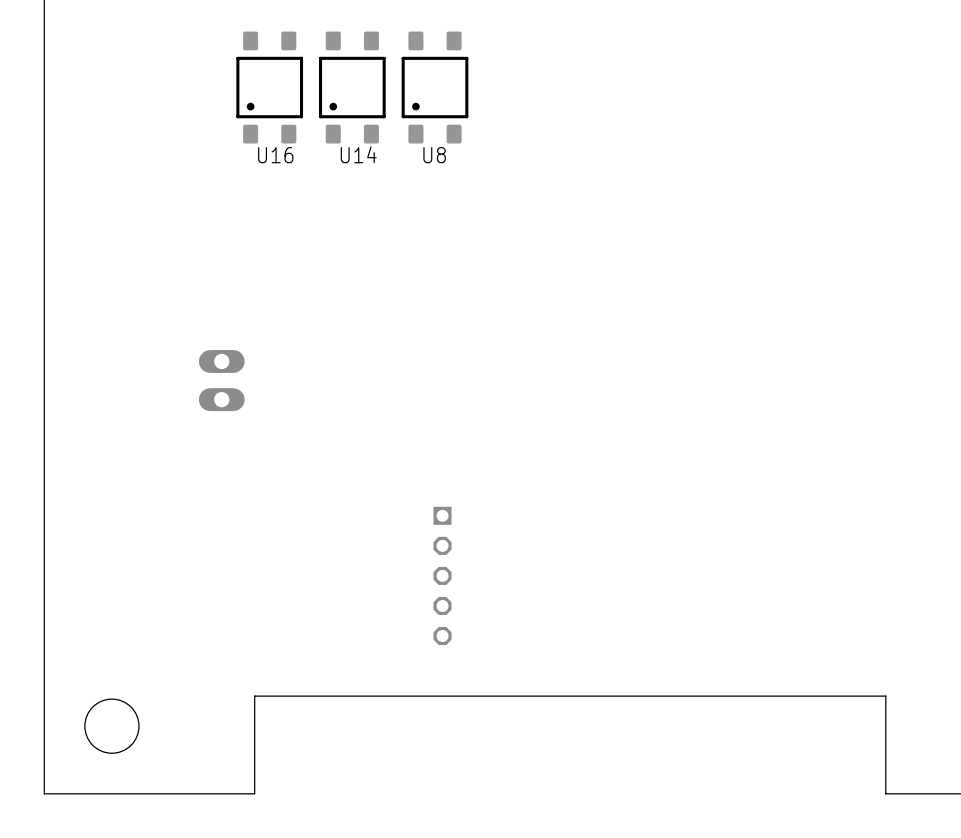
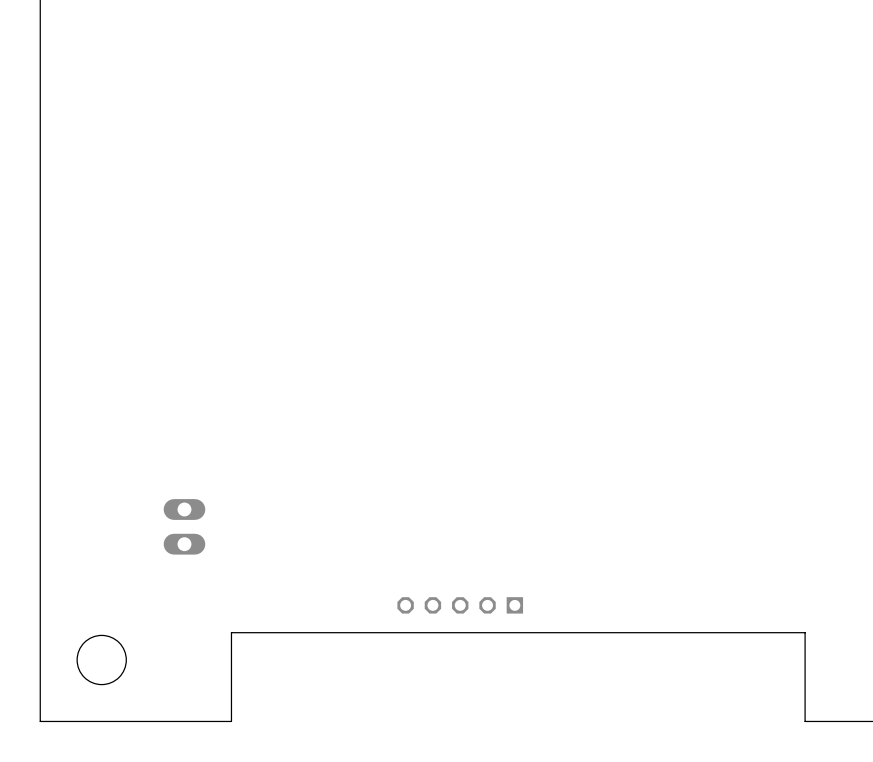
U16: (269, 87) -> none
U14: (352, 87) -> none
U8: (435, 87) -> none
part position: (221, 380) -> (184, 526)
part rotation: 0° (442, 575) -> 90° clockwise (460, 605)
part position: (442, 575) -> (460, 605)

